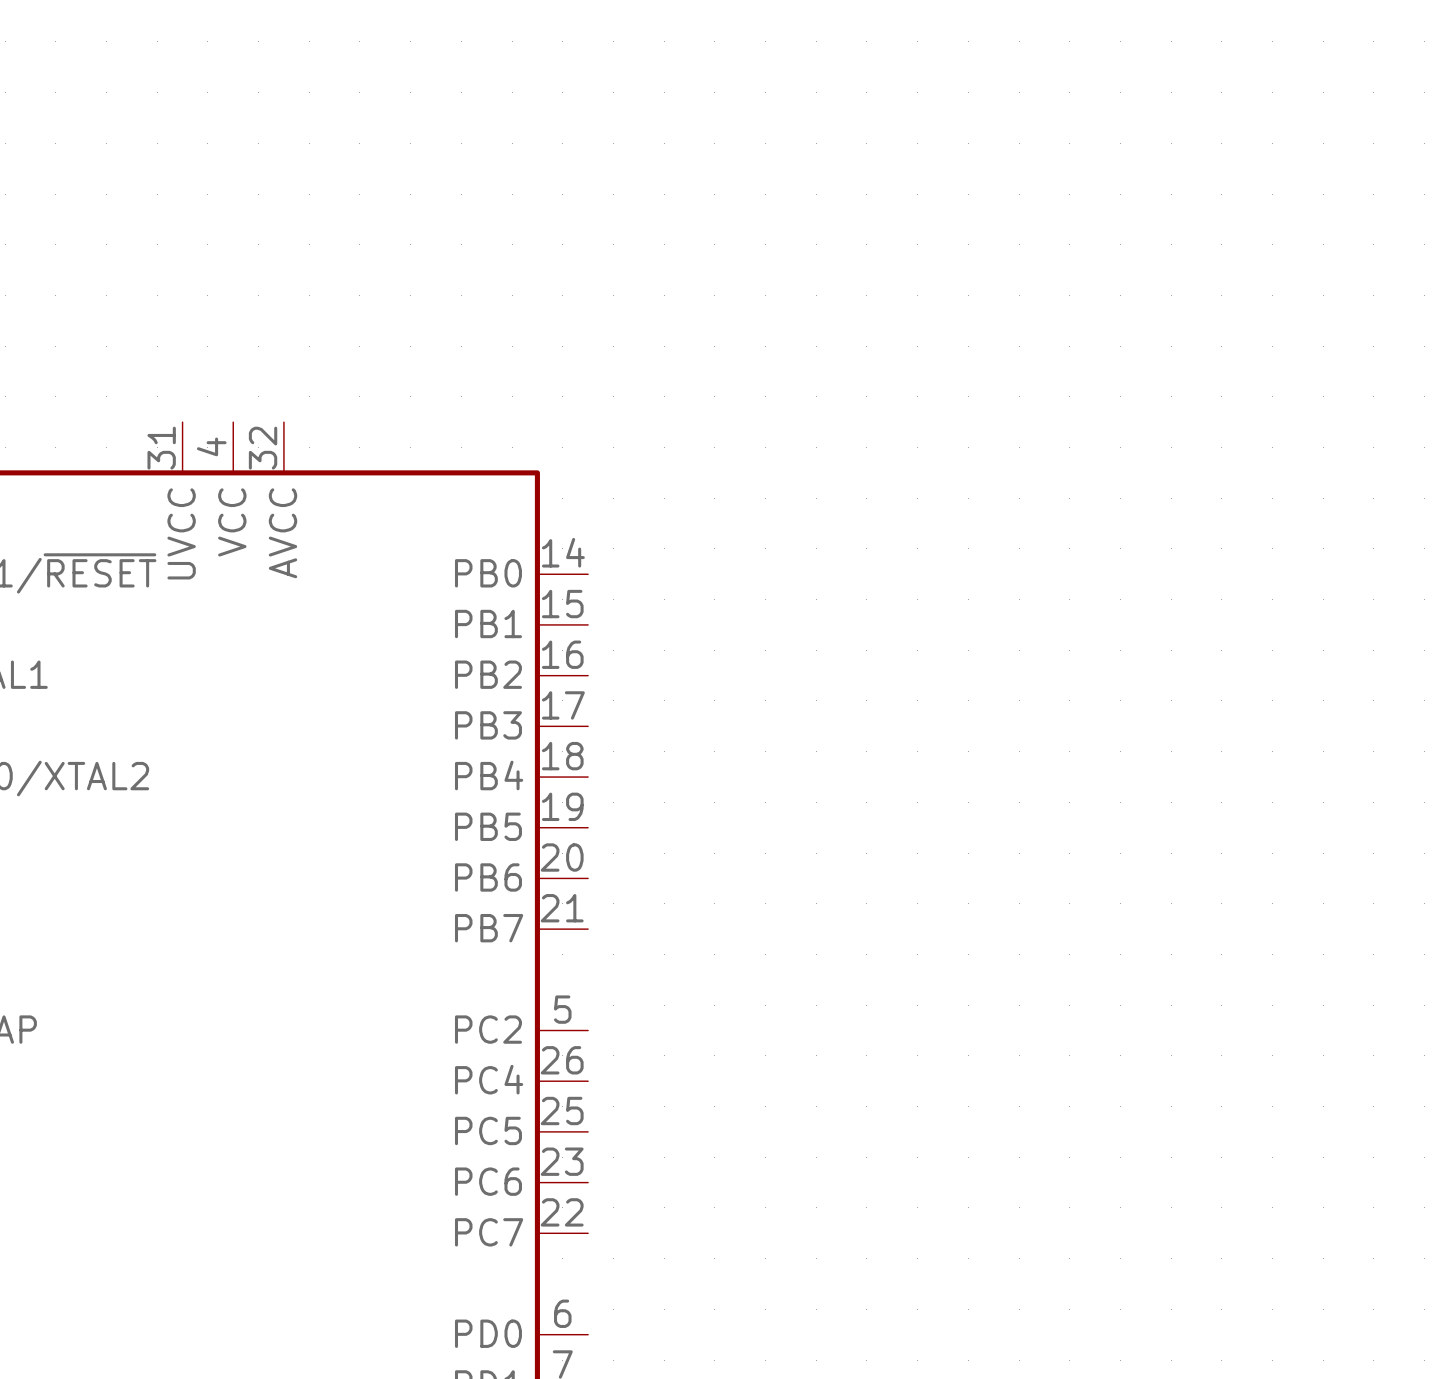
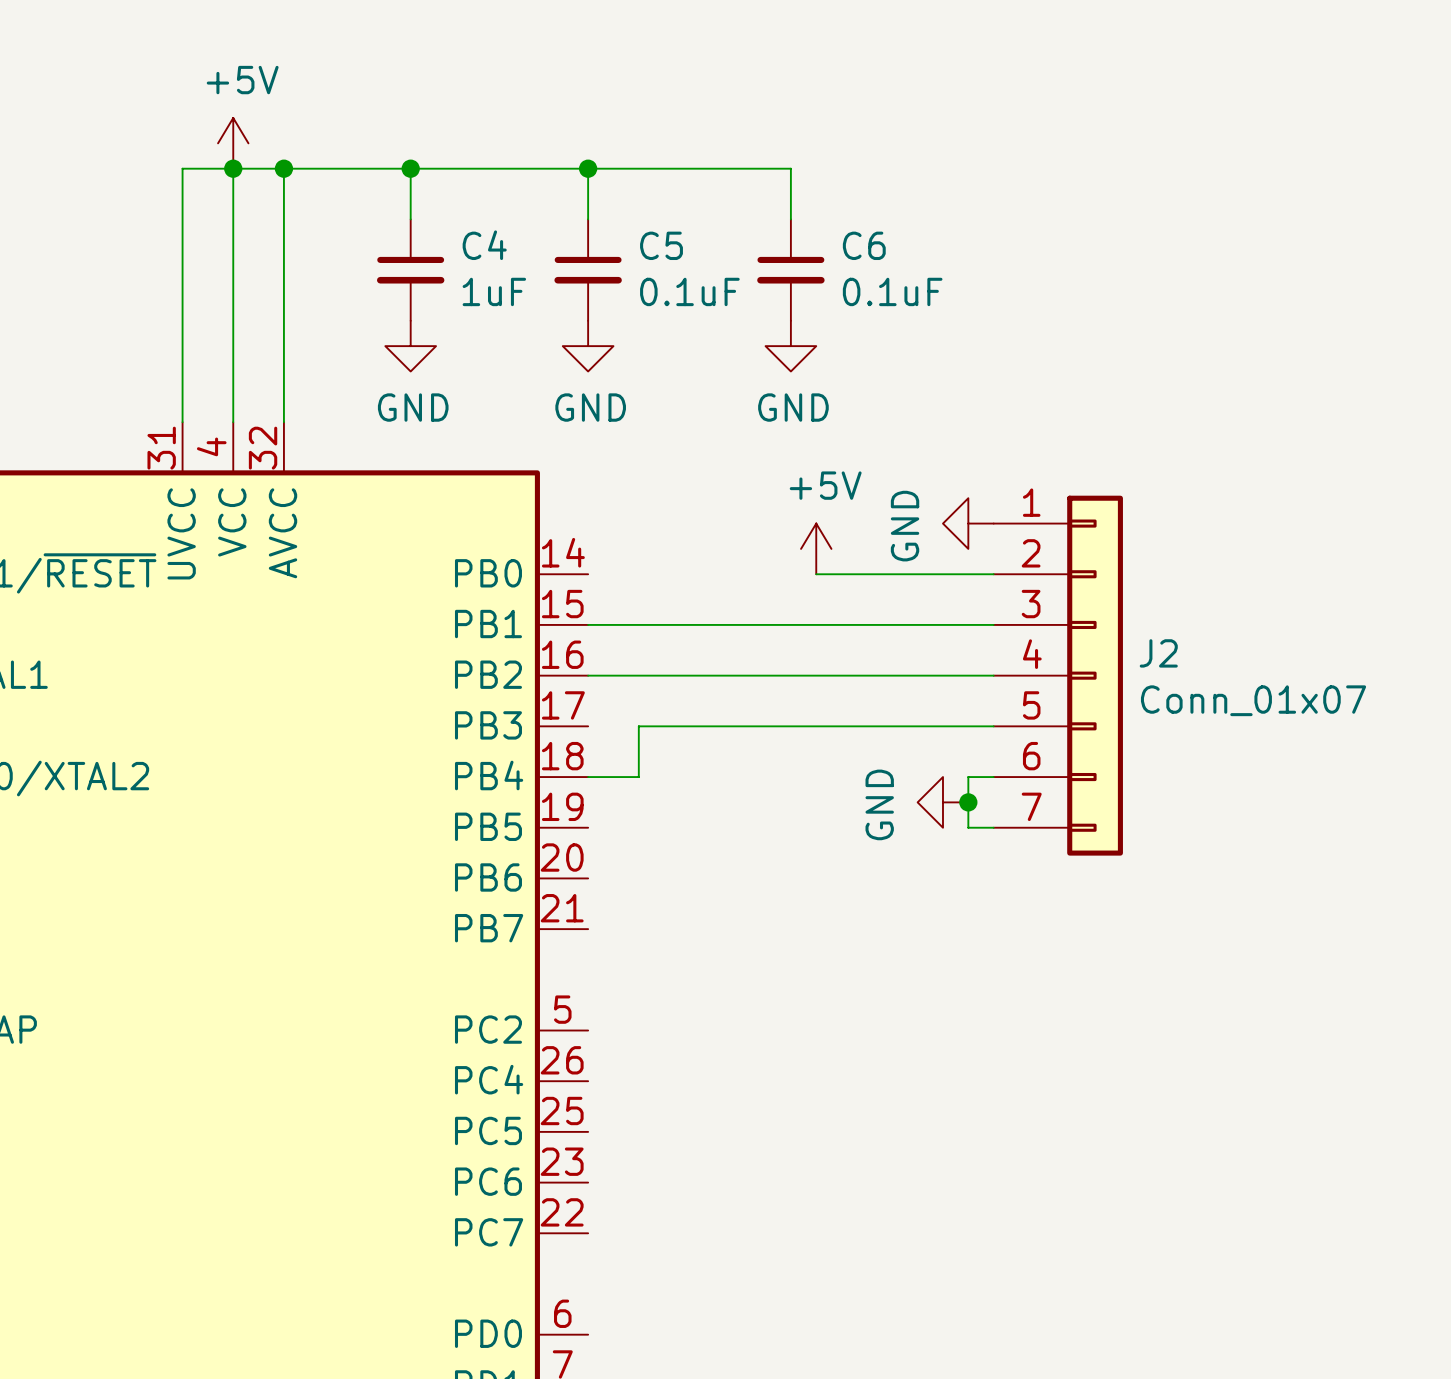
power symbol: none -> +5V (233, 143)
wire: none -> (233, 168) (233, 422)
junction: none -> (233, 168)
wire: none -> (283, 168) (283, 422)
junction: none -> (283, 168)
wire: none -> (410, 168) (410, 219)
junction: none -> (410, 168)
wire: none -> (588, 168) (588, 219)
junction: none -> (588, 168)
wire: none -> (790, 219) (790, 168) (182, 168) (182, 422)
C4: none -> 1uF (410, 270)
C5: none -> 0.1uF (588, 270)
C6: none -> 0.1uF (790, 270)
power symbol: none -> GND (410, 346)
power symbol: none -> GND (588, 346)
power symbol: none -> GND (790, 346)
power symbol: none -> GND (968, 523)
power symbol: none -> +5V (816, 548)
wire: none -> (816, 574) (993, 574)
wire: none -> (588, 624) (993, 624)
wire: none -> (588, 675) (993, 675)
J2: none -> Conn_01x07 (1058, 675)
wire: none -> (993, 726) (638, 726) (638, 777) (588, 777)
wire: none -> (993, 777) (968, 777) (968, 827) (993, 827)
power symbol: none -> GND (942, 802)
junction: none -> (968, 802)

